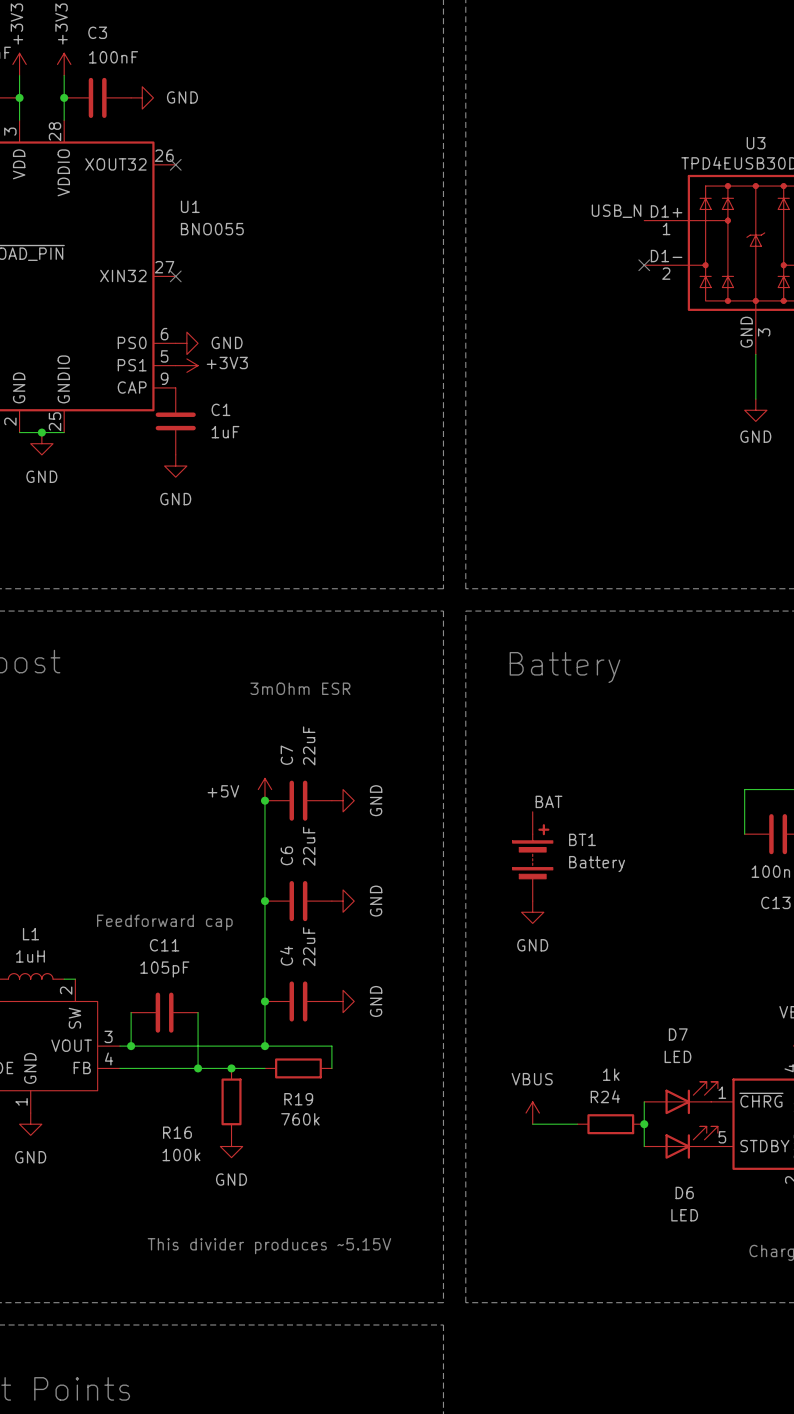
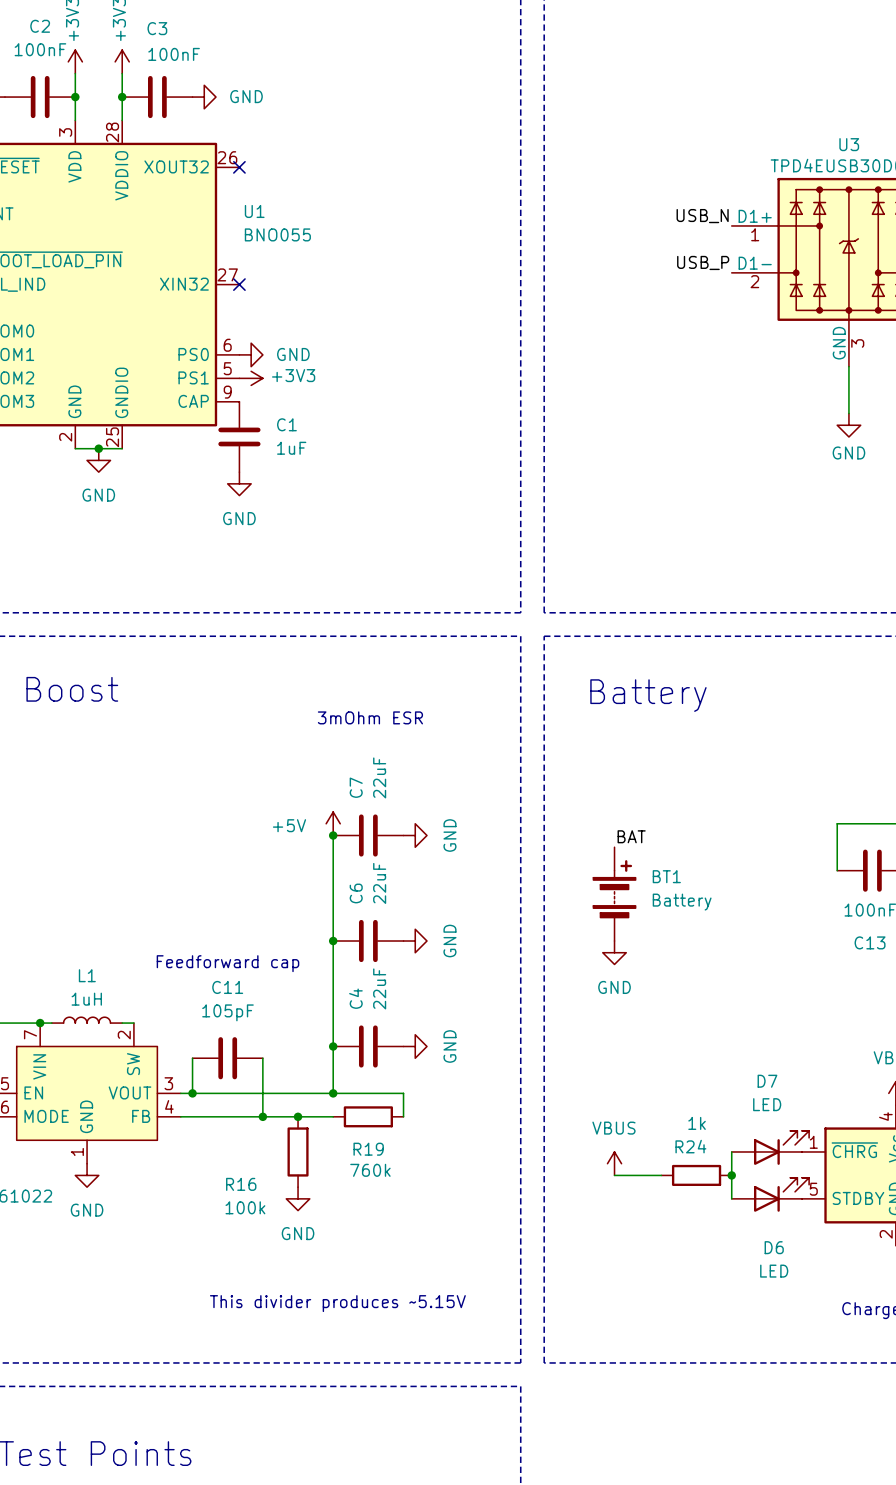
label: none -> USB_P (703, 262)
no-connect mark: (644, 265) -> none

